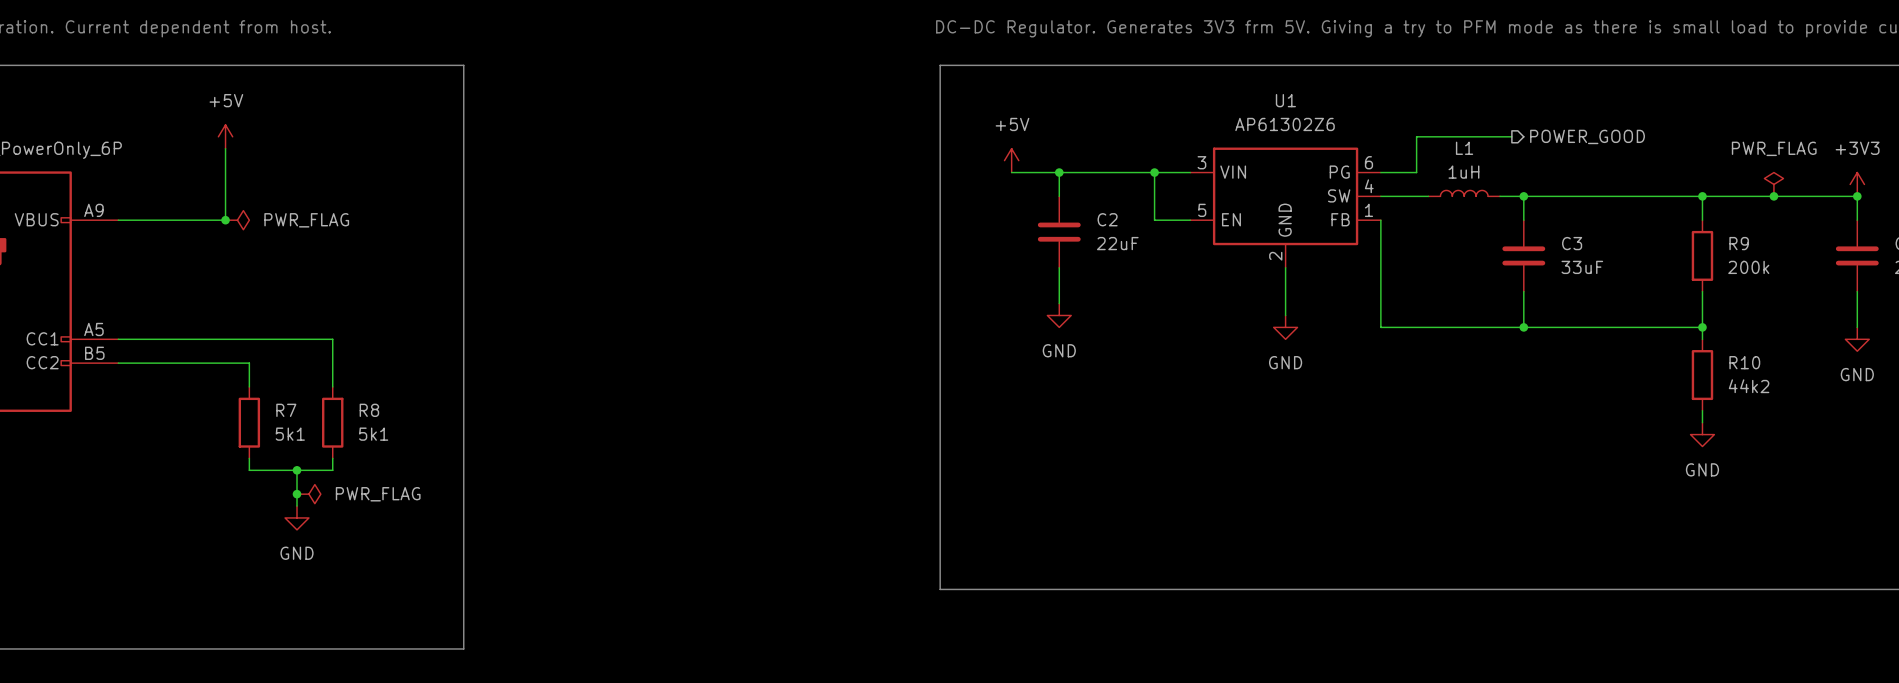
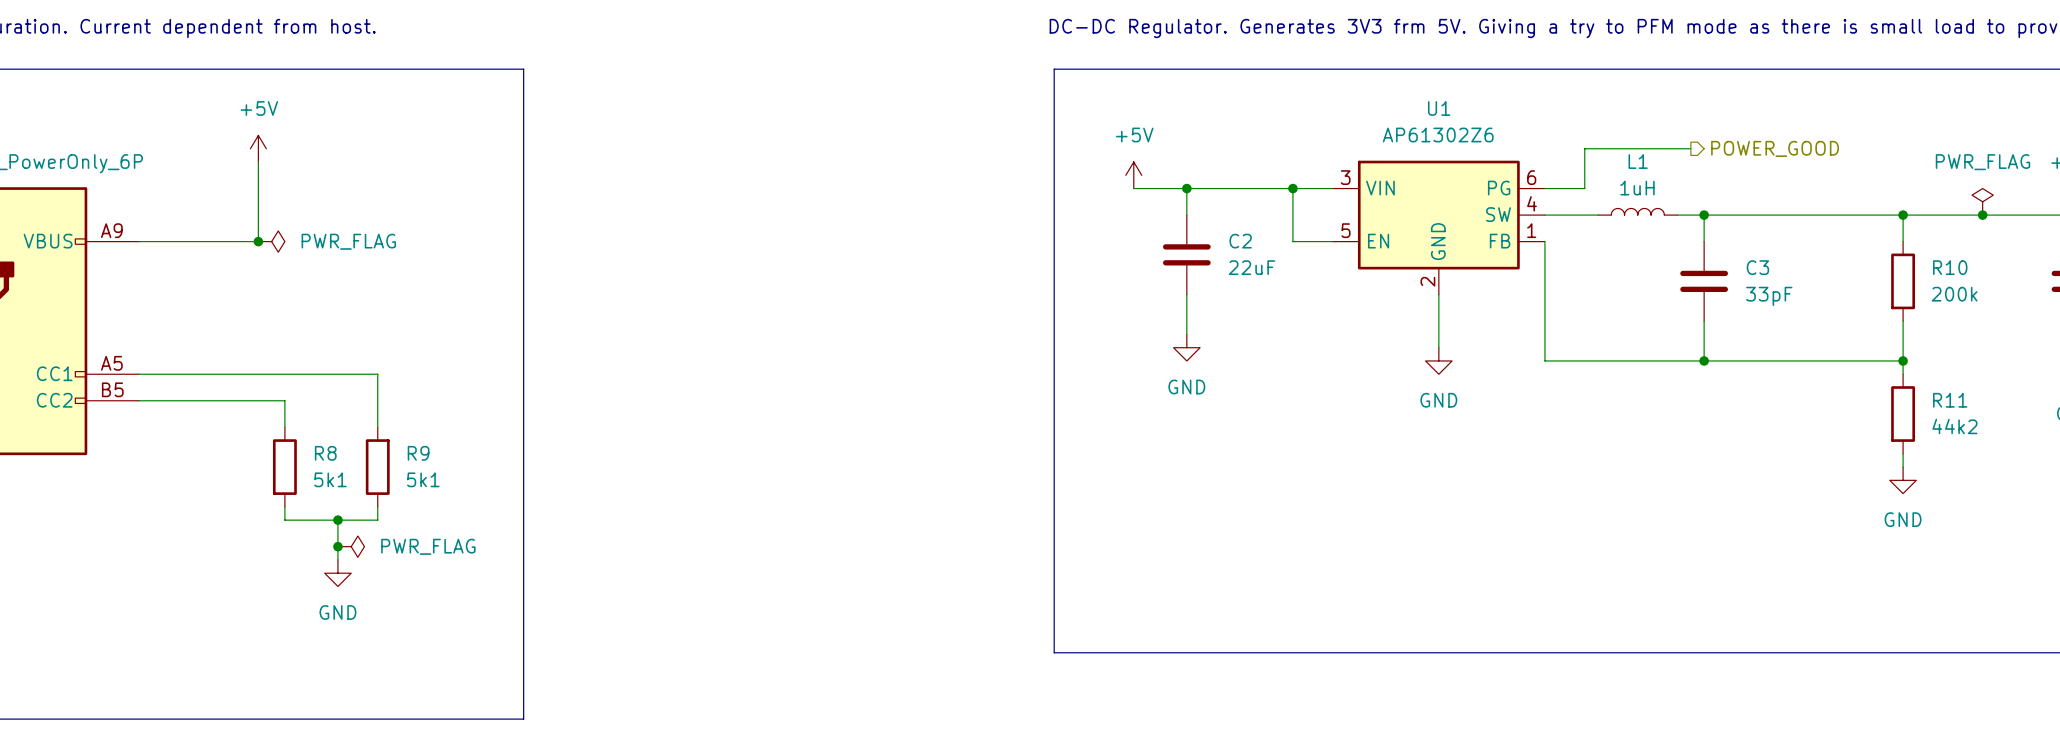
R9 name: R9 (1739, 243) -> R10 (1950, 267)
C3 value: 33uF (1582, 267) -> 33pF (1769, 296)
R10 name: R10 (1744, 362) -> R11 (1950, 400)
R7 name: R7 (286, 410) -> R8 (325, 453)
R8 name: R8 (369, 410) -> R9 (418, 453)

